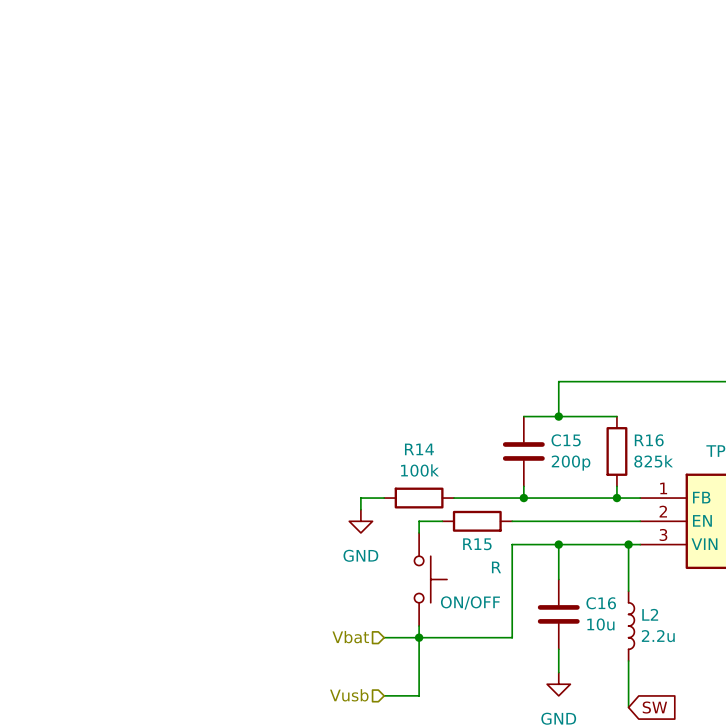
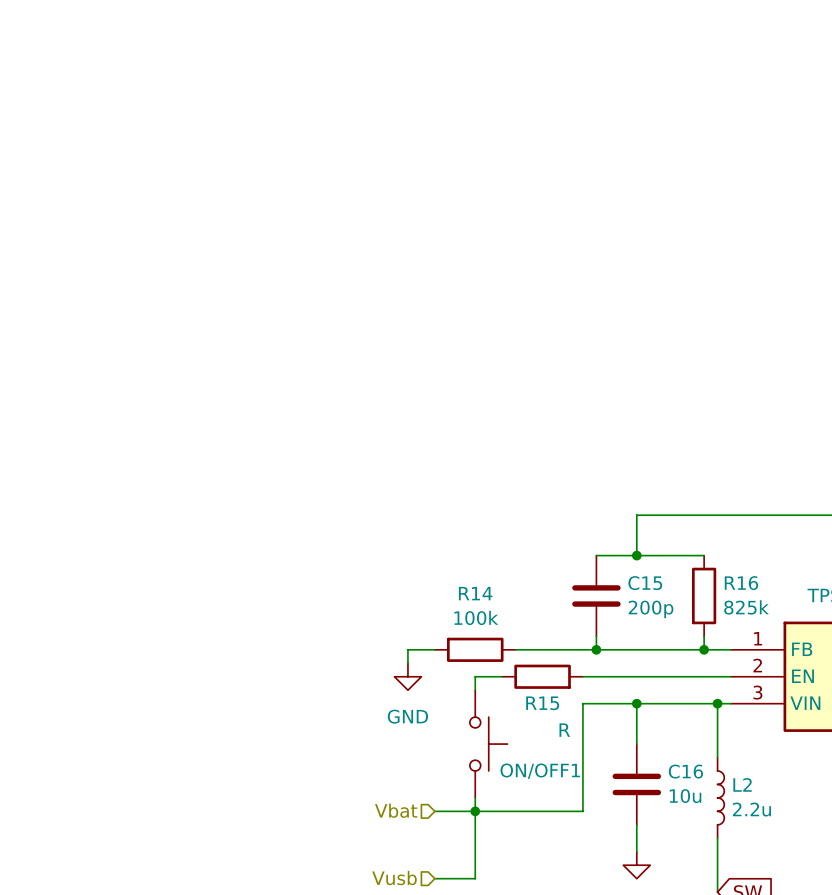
ON/OFF name: ON/OFF (470, 602) -> ON/OFF1 (540, 771)

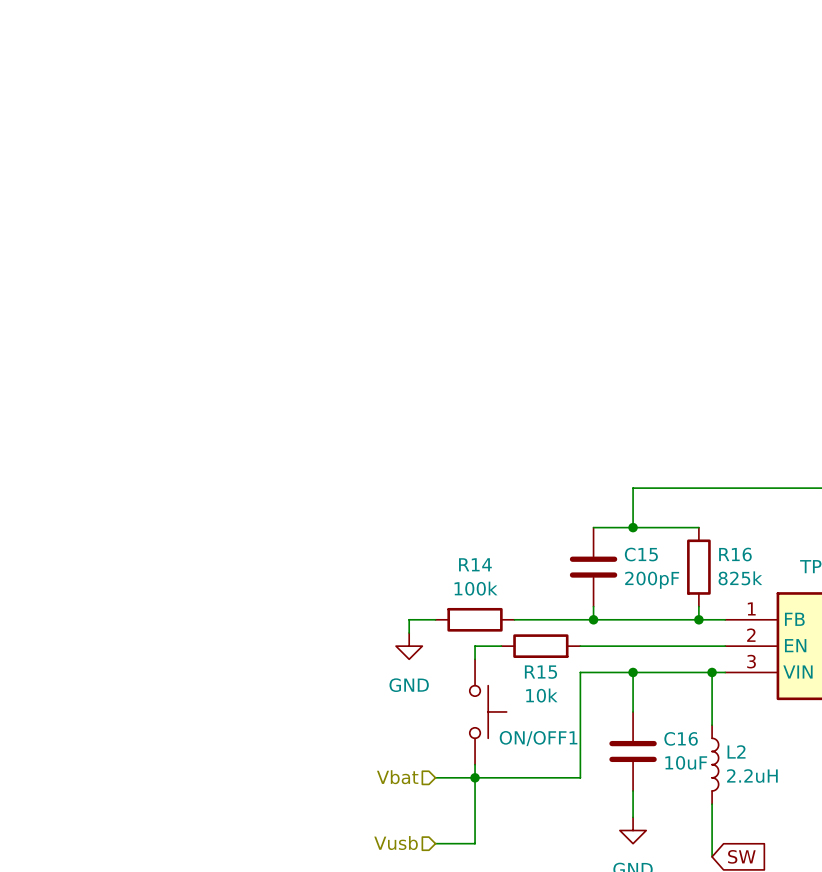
C15 value: 200p (651, 609) -> 200pF (652, 580)
R15 value: R (564, 730) -> 10k (541, 695)
C16 value: 10u (685, 796) -> 10uF (686, 762)
L2 value: 2.2u (751, 809) -> 2.2uH (752, 776)

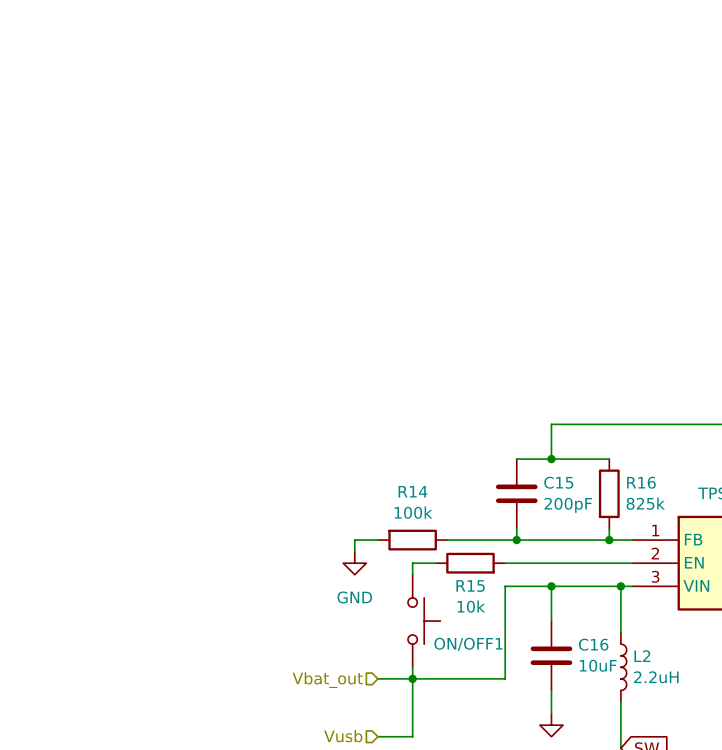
hierarchical label: Vbat (397, 777) -> Vbat_out (327, 680)

